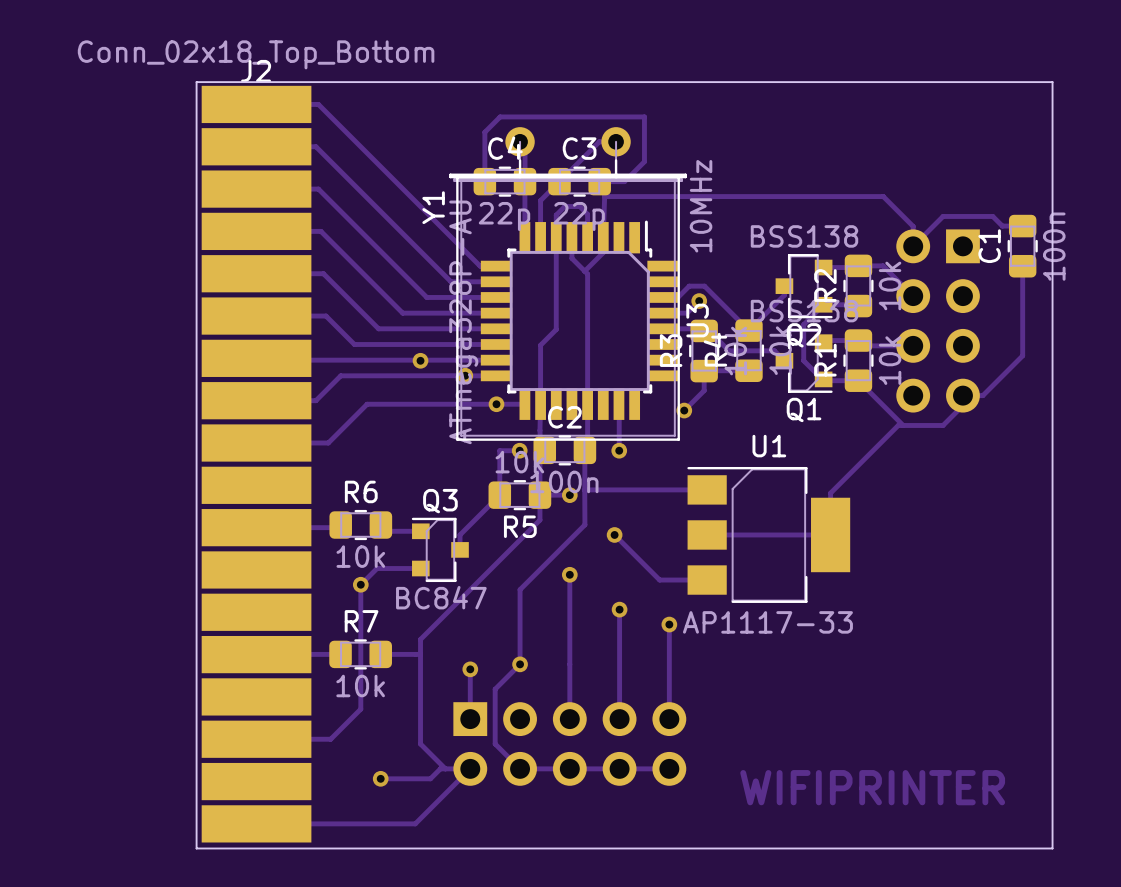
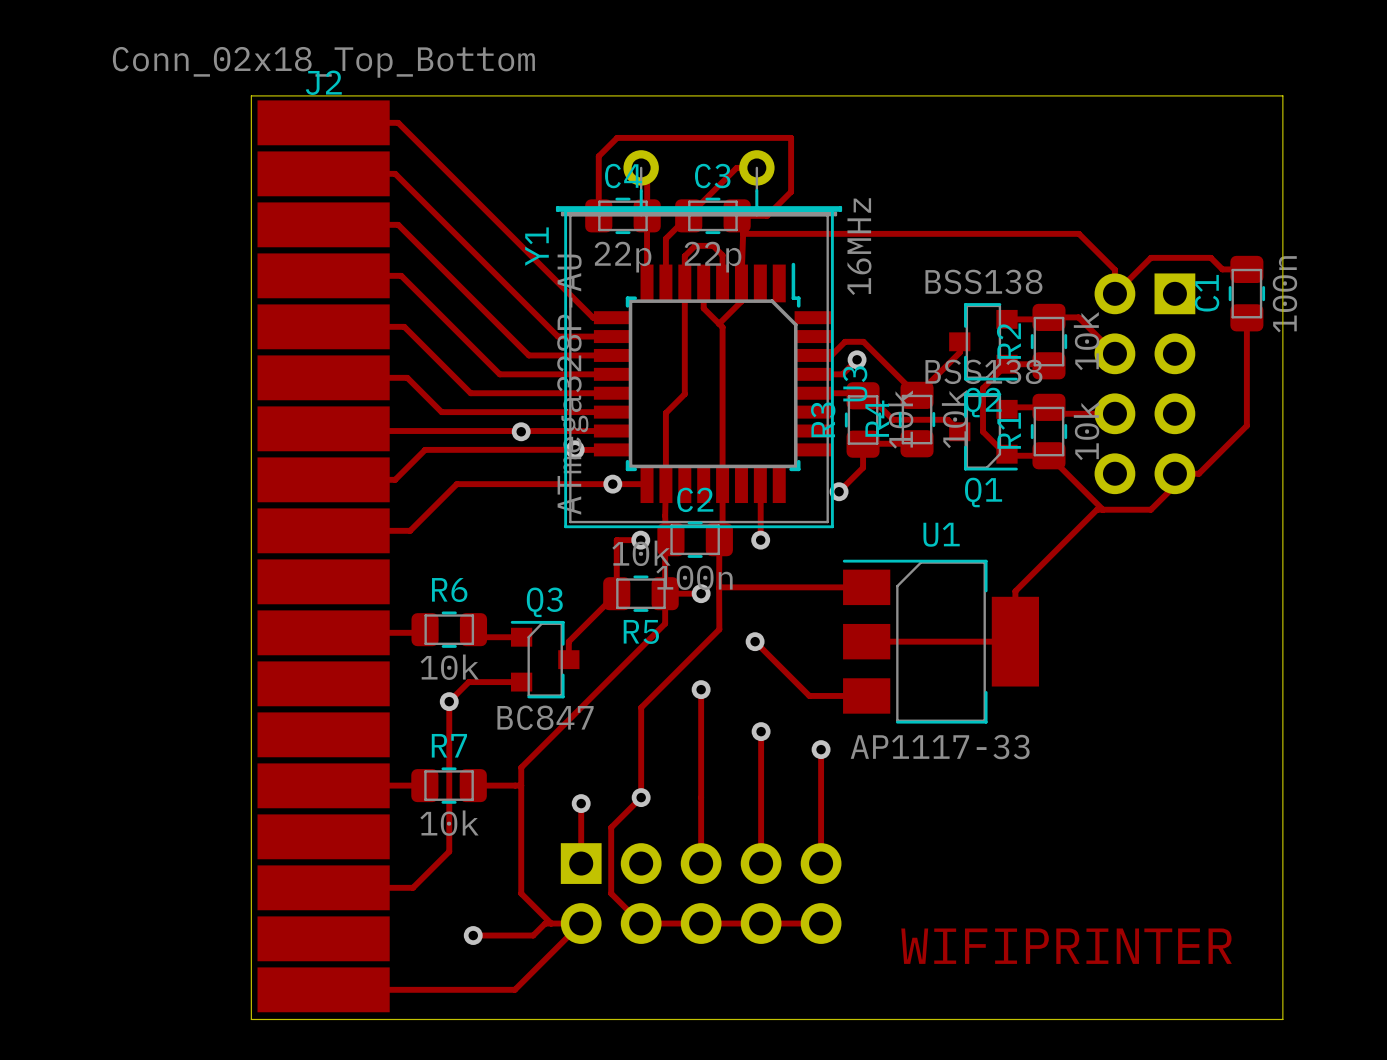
Y1 value: 10MHz (701, 206) -> 16MHz (859, 246)

